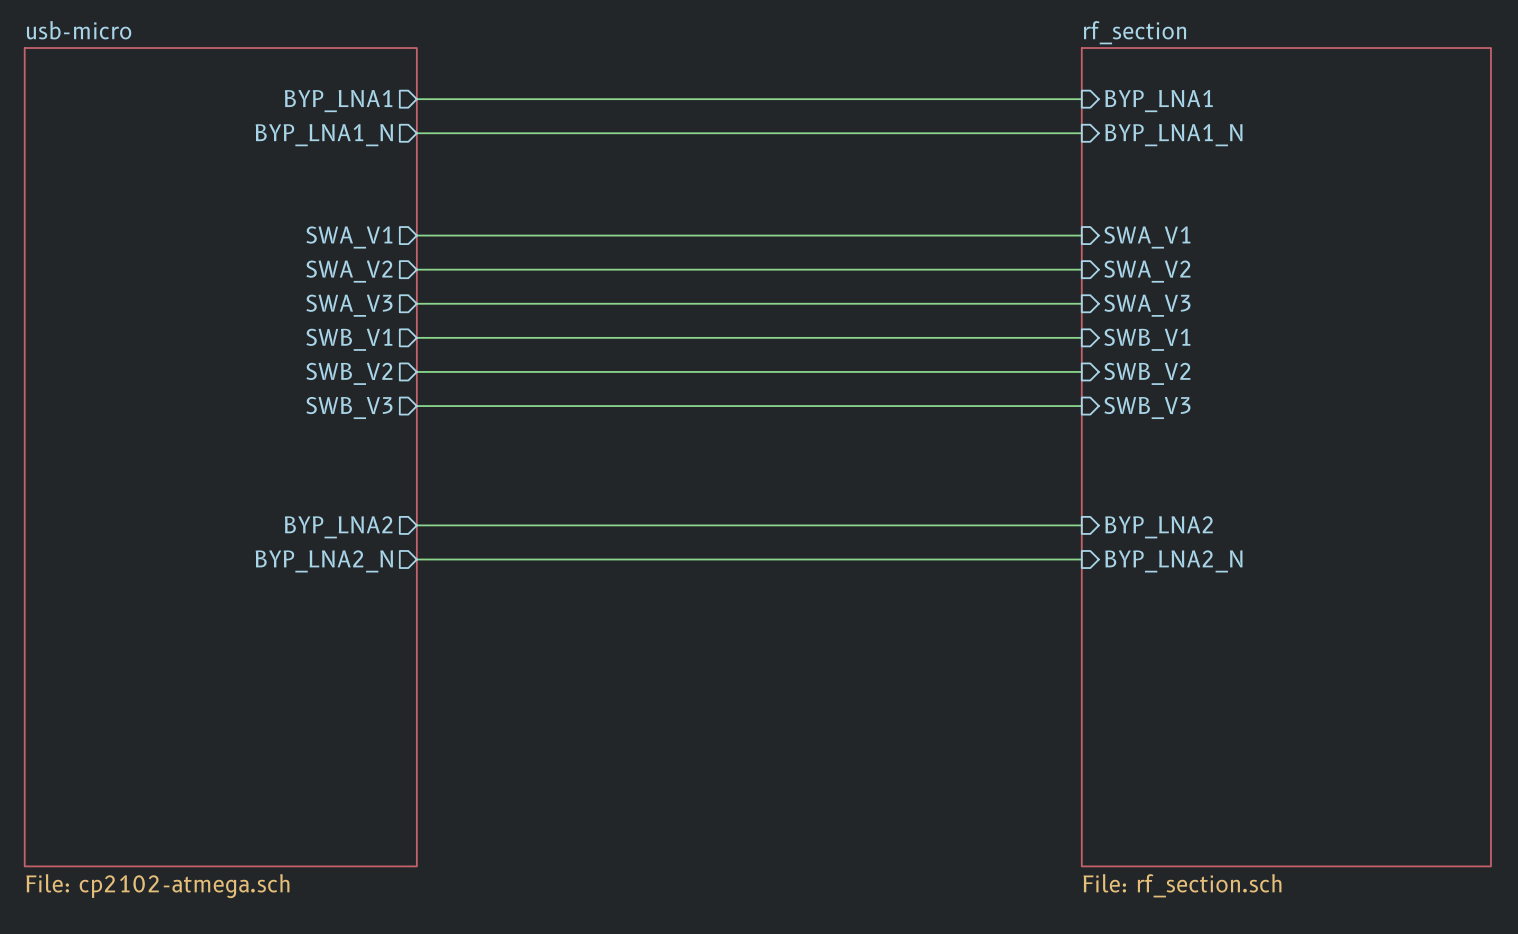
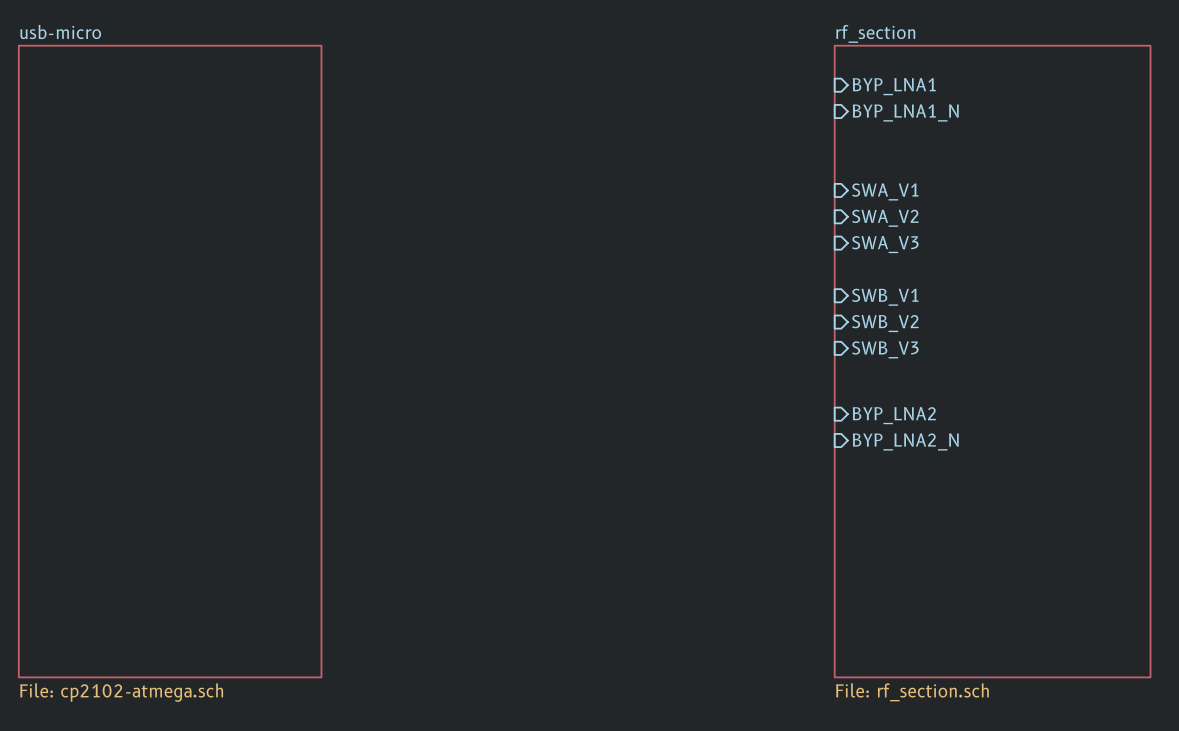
wire: (416, 99) (1081, 99) -> none
sheet pin: BYP_LNA1 (338, 101) -> none
wire: (416, 133) (1081, 133) -> none
sheet pin: BYP_LNA1_N (324, 135) -> none
wire: (416, 235) (1081, 235) -> none
sheet pin: SWA_V1 (349, 237) -> none
wire: (416, 269) (1081, 269) -> none
sheet pin: SWA_V2 (349, 271) -> none
wire: (416, 303) (1081, 303) -> none
sheet pin: SWA_V3 (349, 305) -> none
wire: (416, 337) (1081, 337) -> none
sheet pin: SWB_V1 (349, 339) -> none
sheet pin: SWB_V1 (1147, 339) -> none
wire: (416, 371) (1081, 371) -> none
sheet pin: SWB_V2 (349, 373) -> none
sheet pin: SWB_V2 (1147, 373) -> SWB_V1 (885, 297)
wire: (416, 406) (1081, 406) -> none
sheet pin: SWB_V3 (349, 407) -> none
sheet pin: SWB_V3 (1147, 407) -> SWB_V2 (885, 323)
sheet pin: none -> SWB_V3 (885, 349)
wire: (416, 525) (1081, 525) -> none
sheet pin: BYP_LNA2 (338, 527) -> none
wire: (416, 559) (1081, 559) -> none
sheet pin: BYP_LNA2_N (324, 561) -> none

